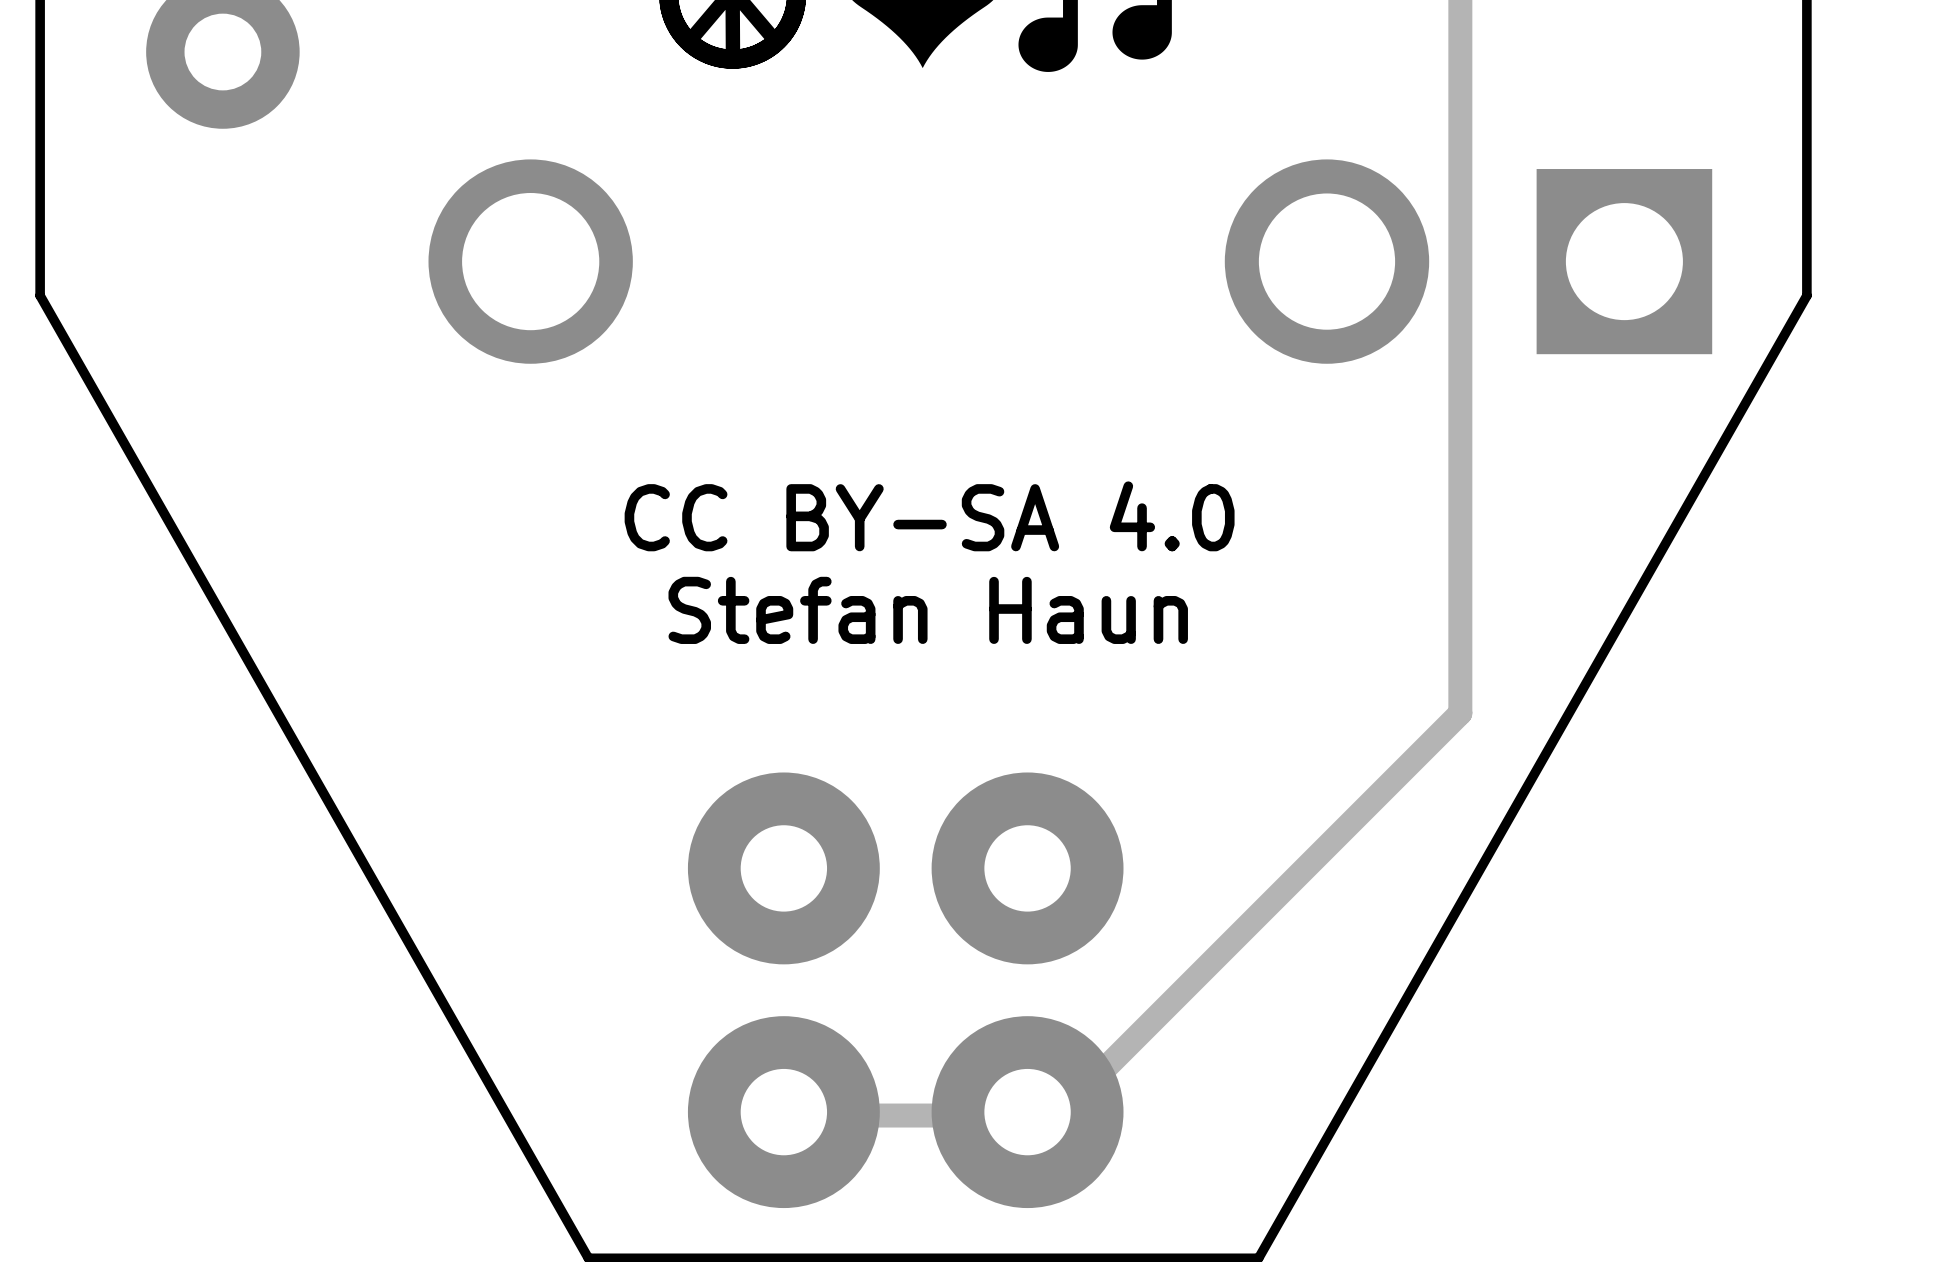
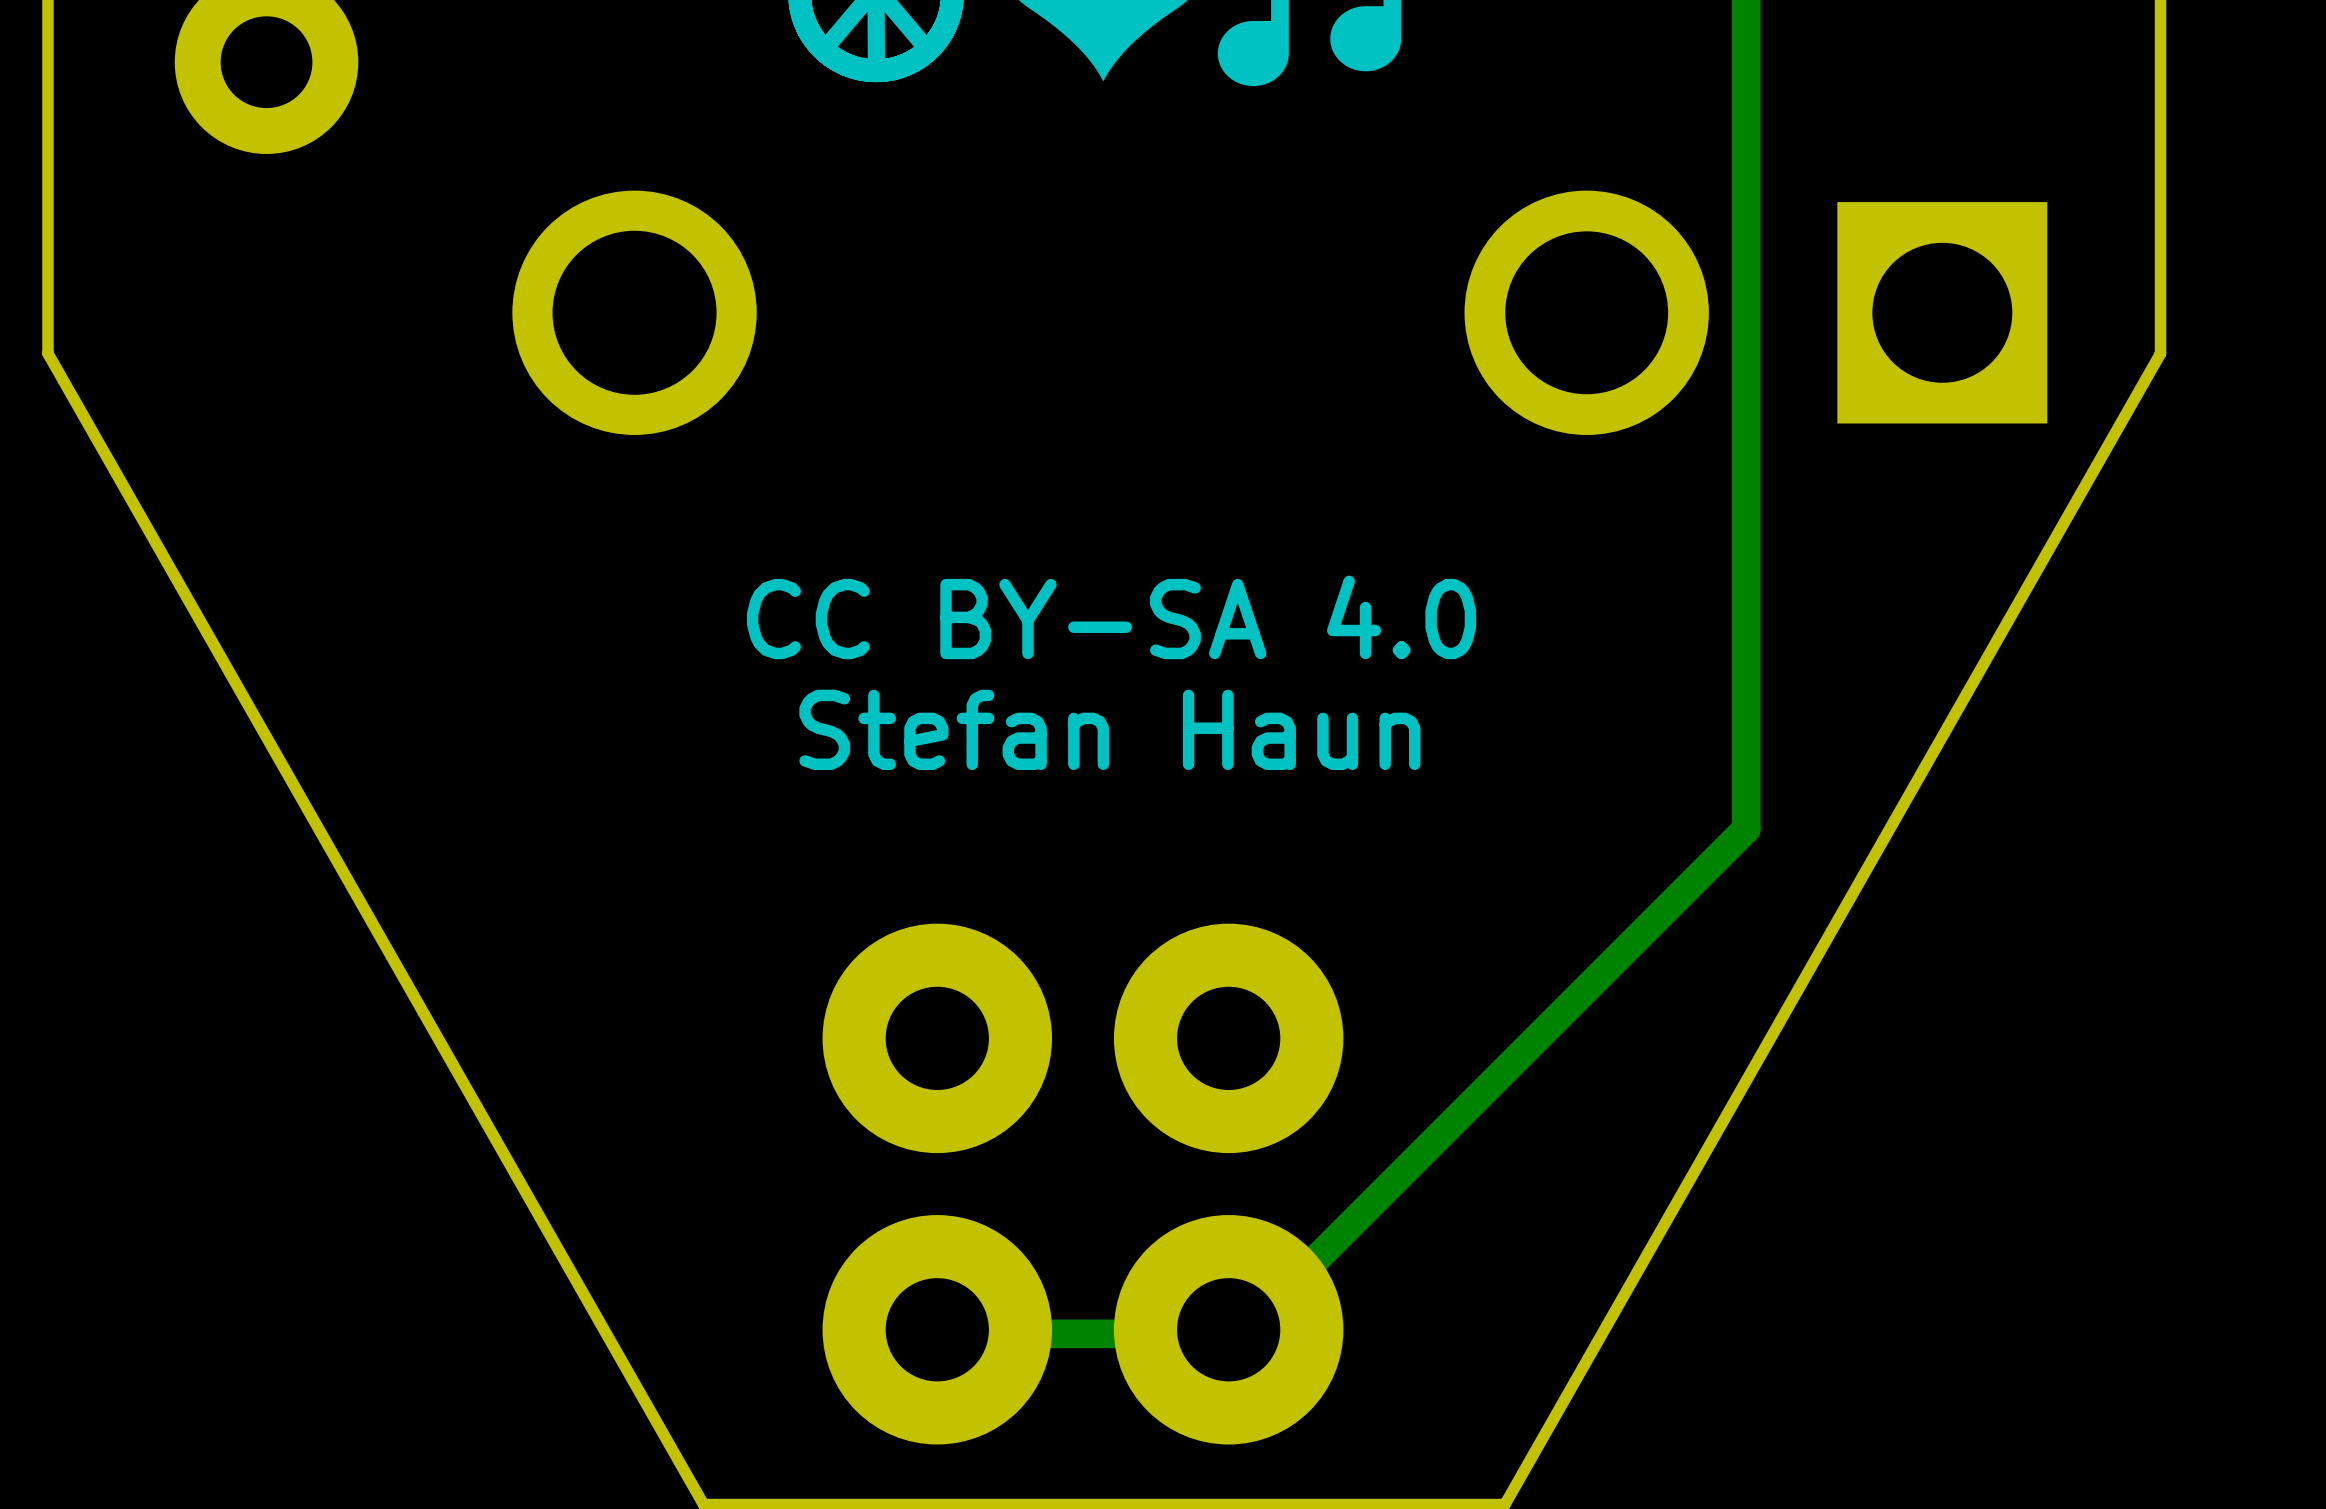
track: (1460, 693) (1460, 713) (1058, 1115) (1038, 1115) -> (1746, 829) (1241, 1333)

